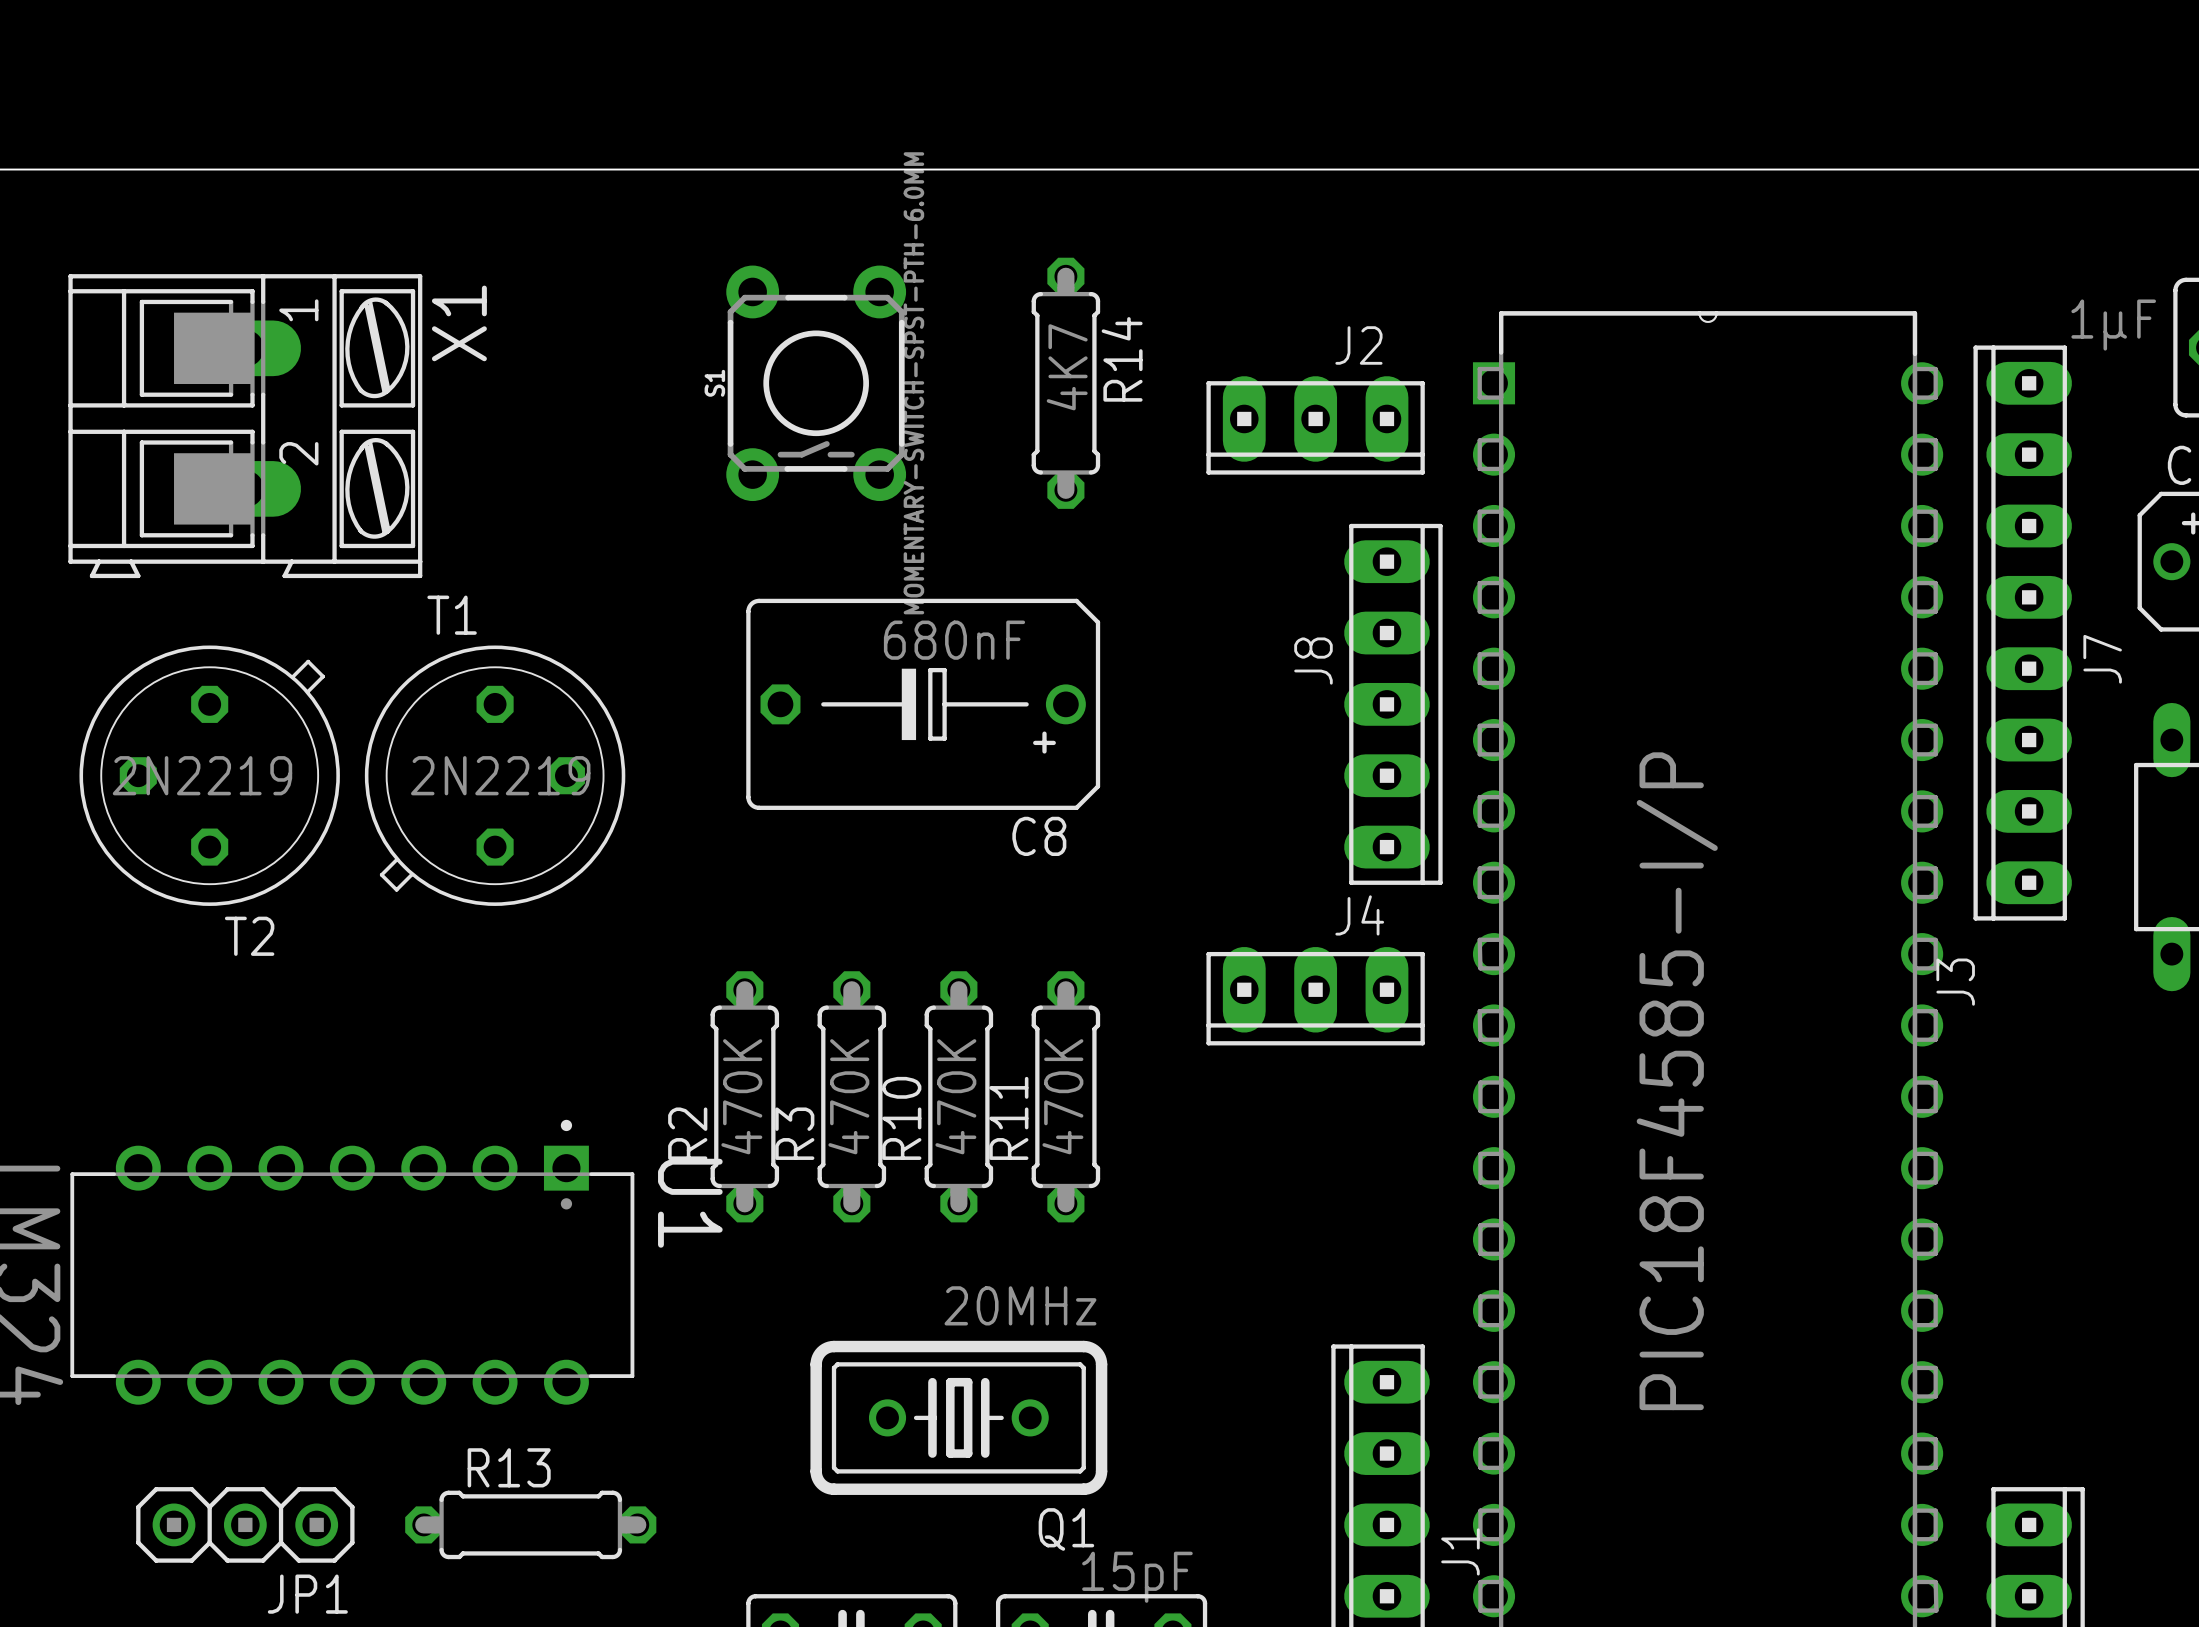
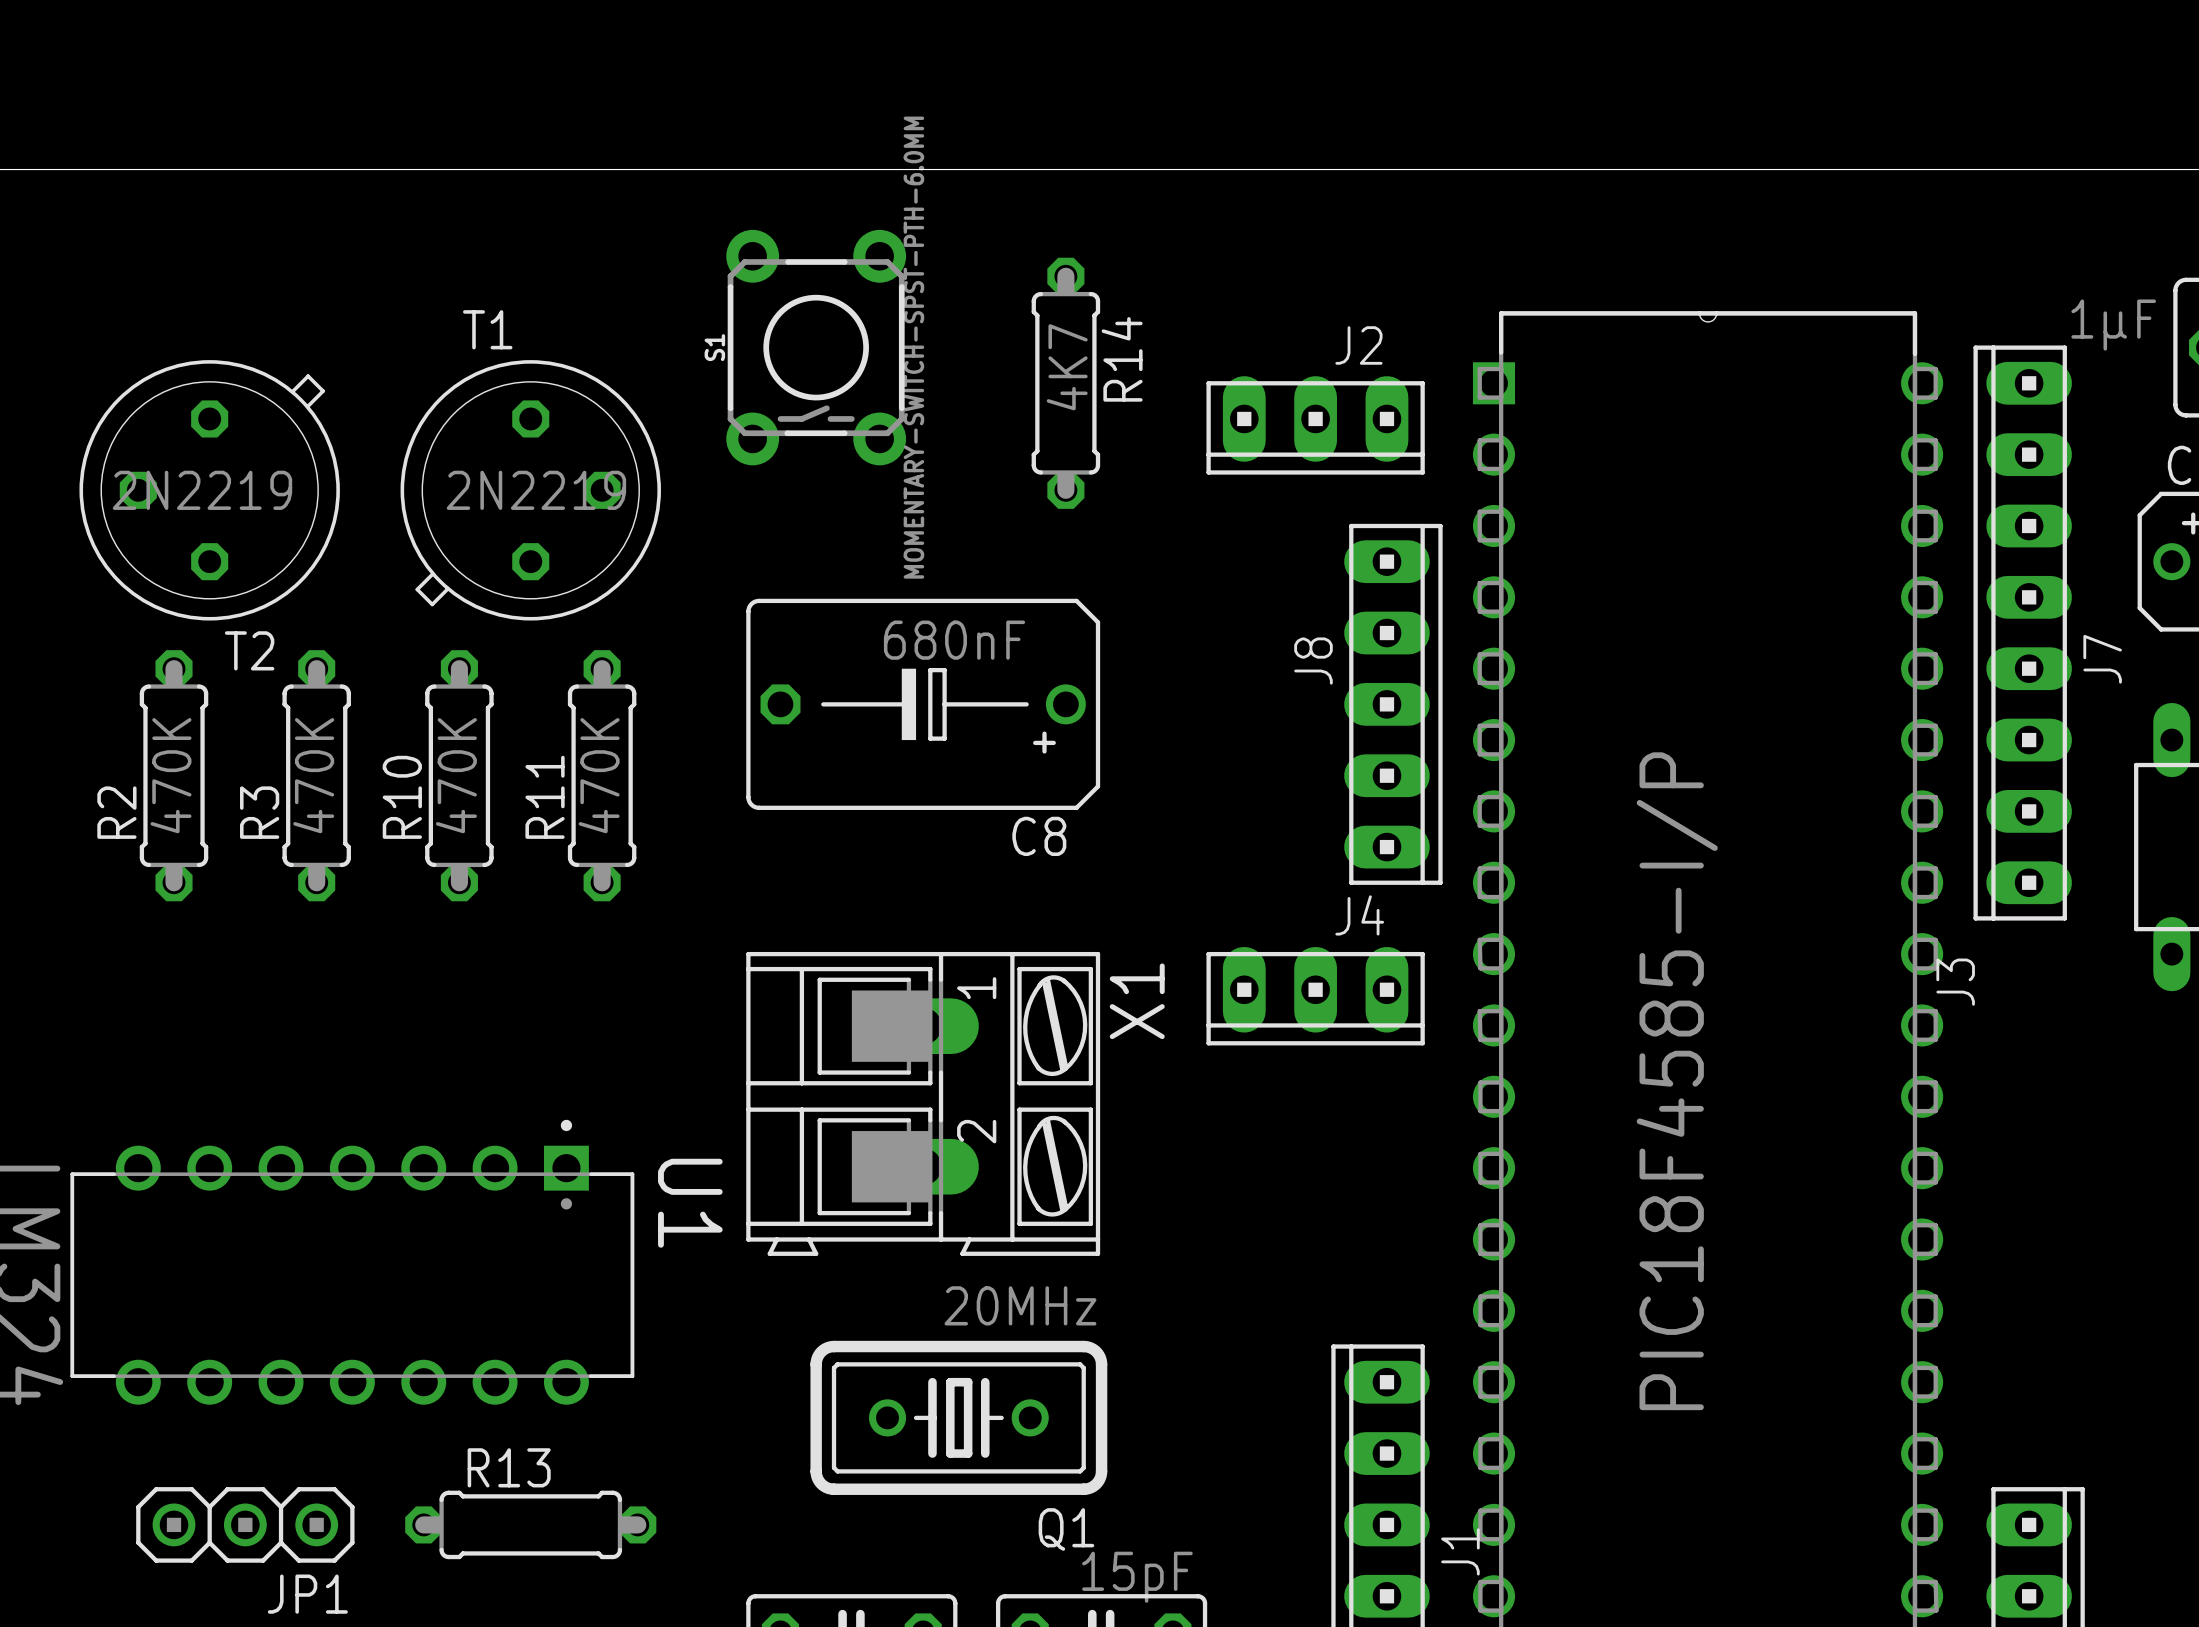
S1 position: (816, 383) -> (816, 347)
X1 position: (245, 426) -> (923, 1103)
T2 position: (209, 775) -> (209, 490)
T1 position: (495, 775) -> (530, 490)
R2 position: (744, 1096) -> (174, 775)
R3 position: (851, 1096) -> (316, 775)
R10 position: (958, 1096) -> (459, 775)
R11 position: (1065, 1096) -> (602, 775)

